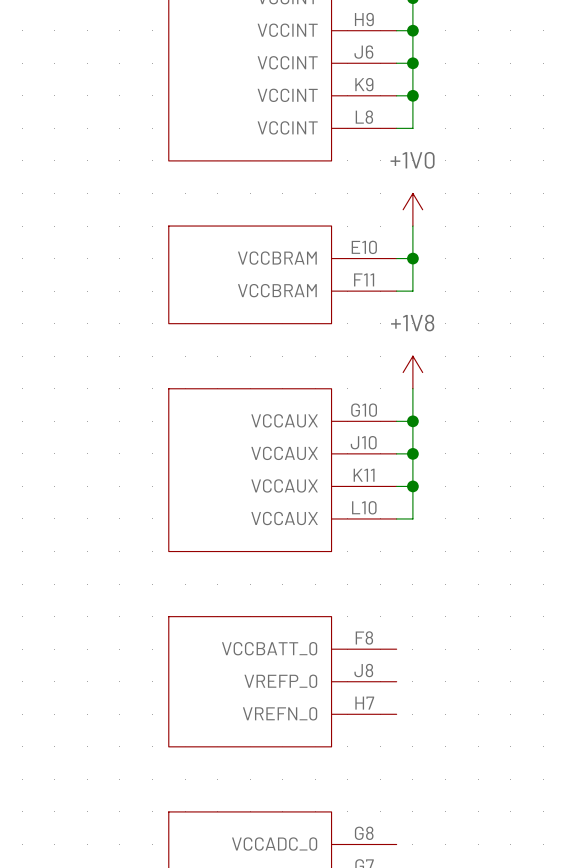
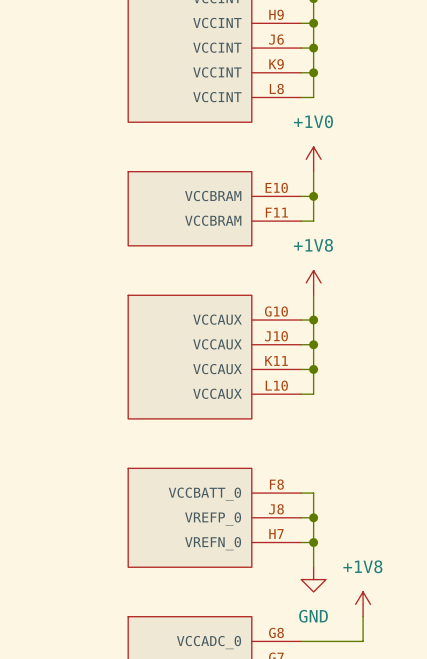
wire: none -> (301, 493) (313, 493) (313, 567)
wire: none -> (301, 517) (313, 517)
junction: none -> (313, 517)
wire: none -> (301, 542) (313, 542)
junction: none -> (313, 542)
power symbol: none -> GND (313, 579)
power symbol: none -> +1V8 (363, 604)
wire: none -> (363, 616) (363, 641) (301, 641)

